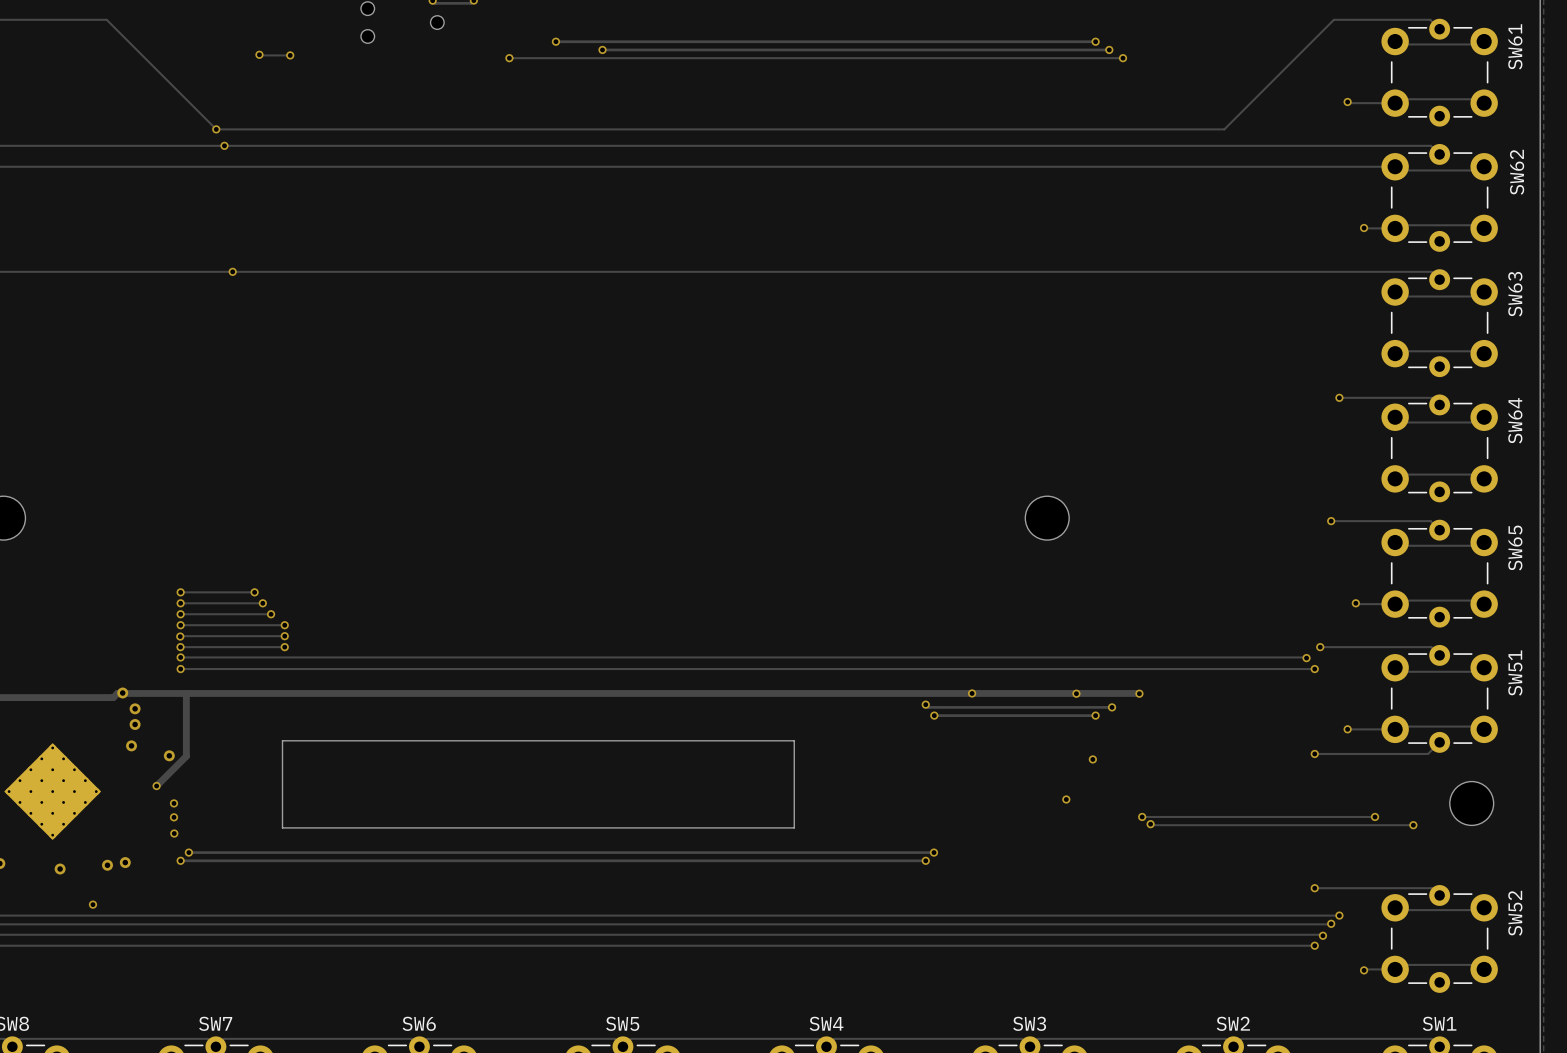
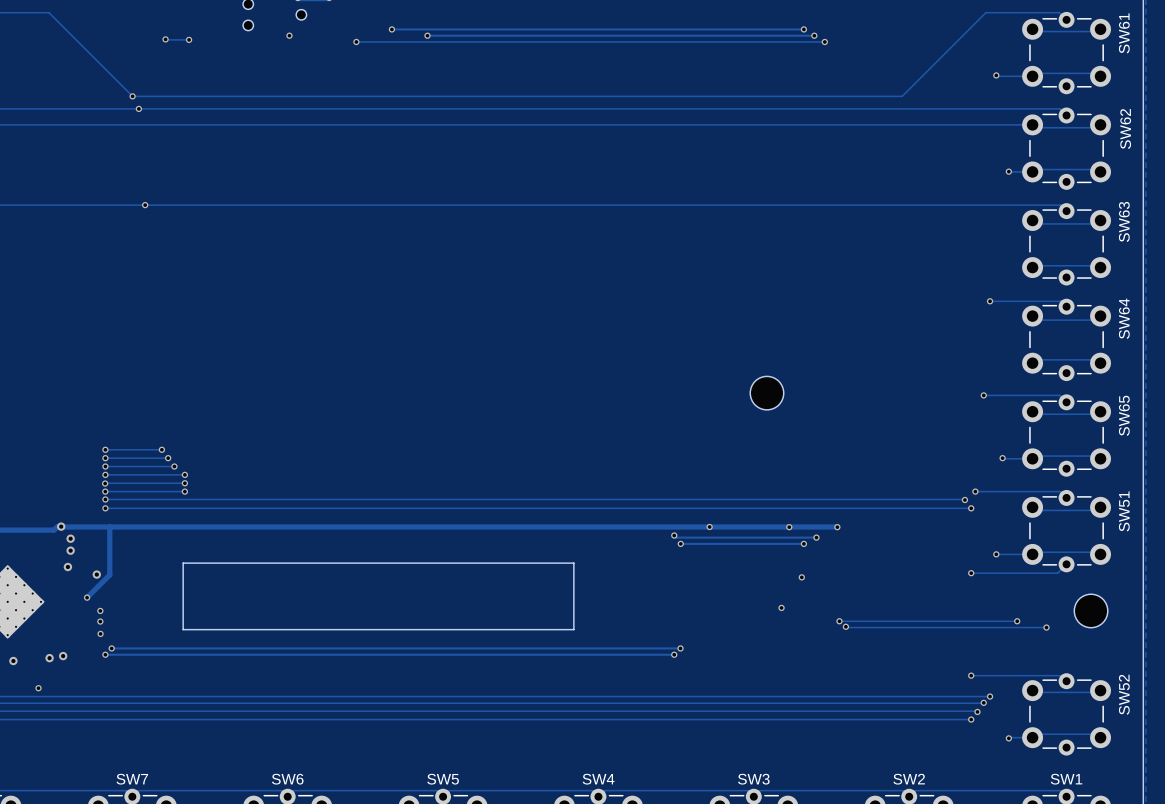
via: none -> (289, 35)

